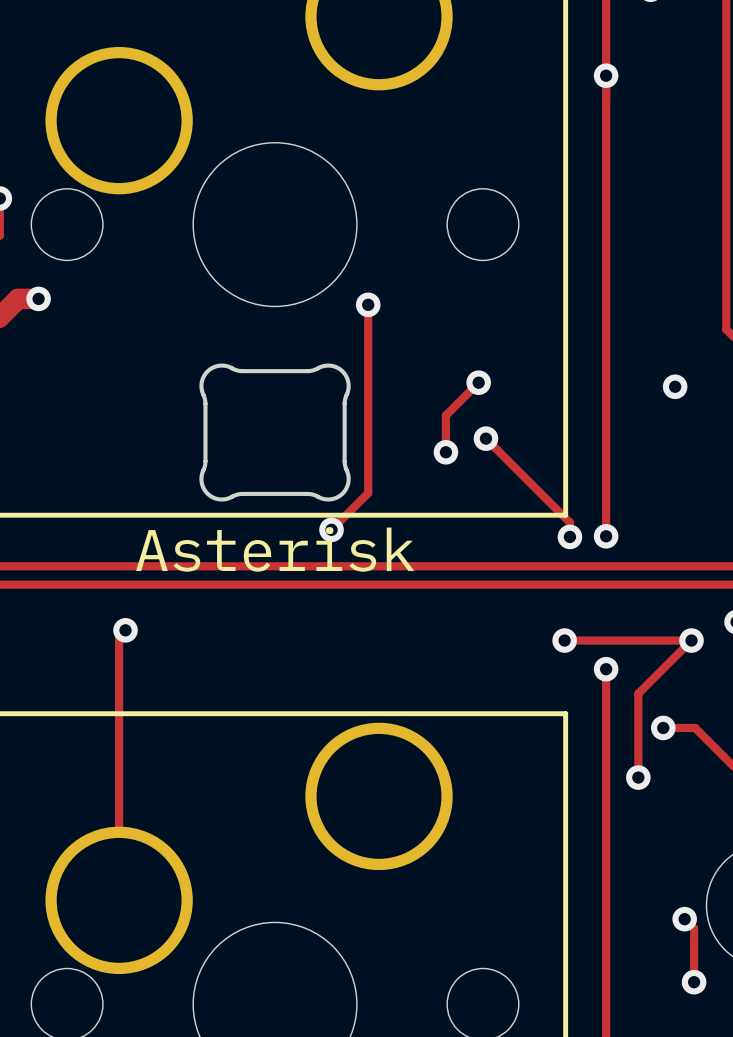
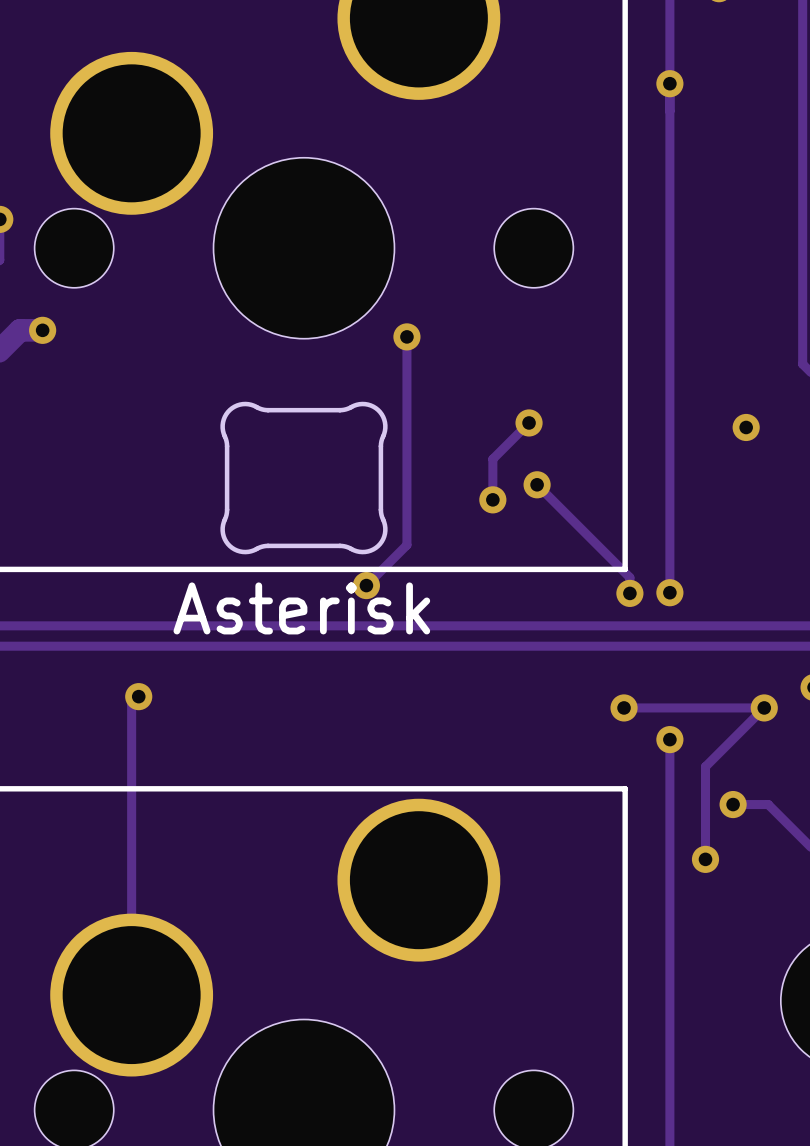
track: (684, 919) (694, 928) (694, 982) -> none
via: (684, 919) -> none
via: (694, 982) -> none

